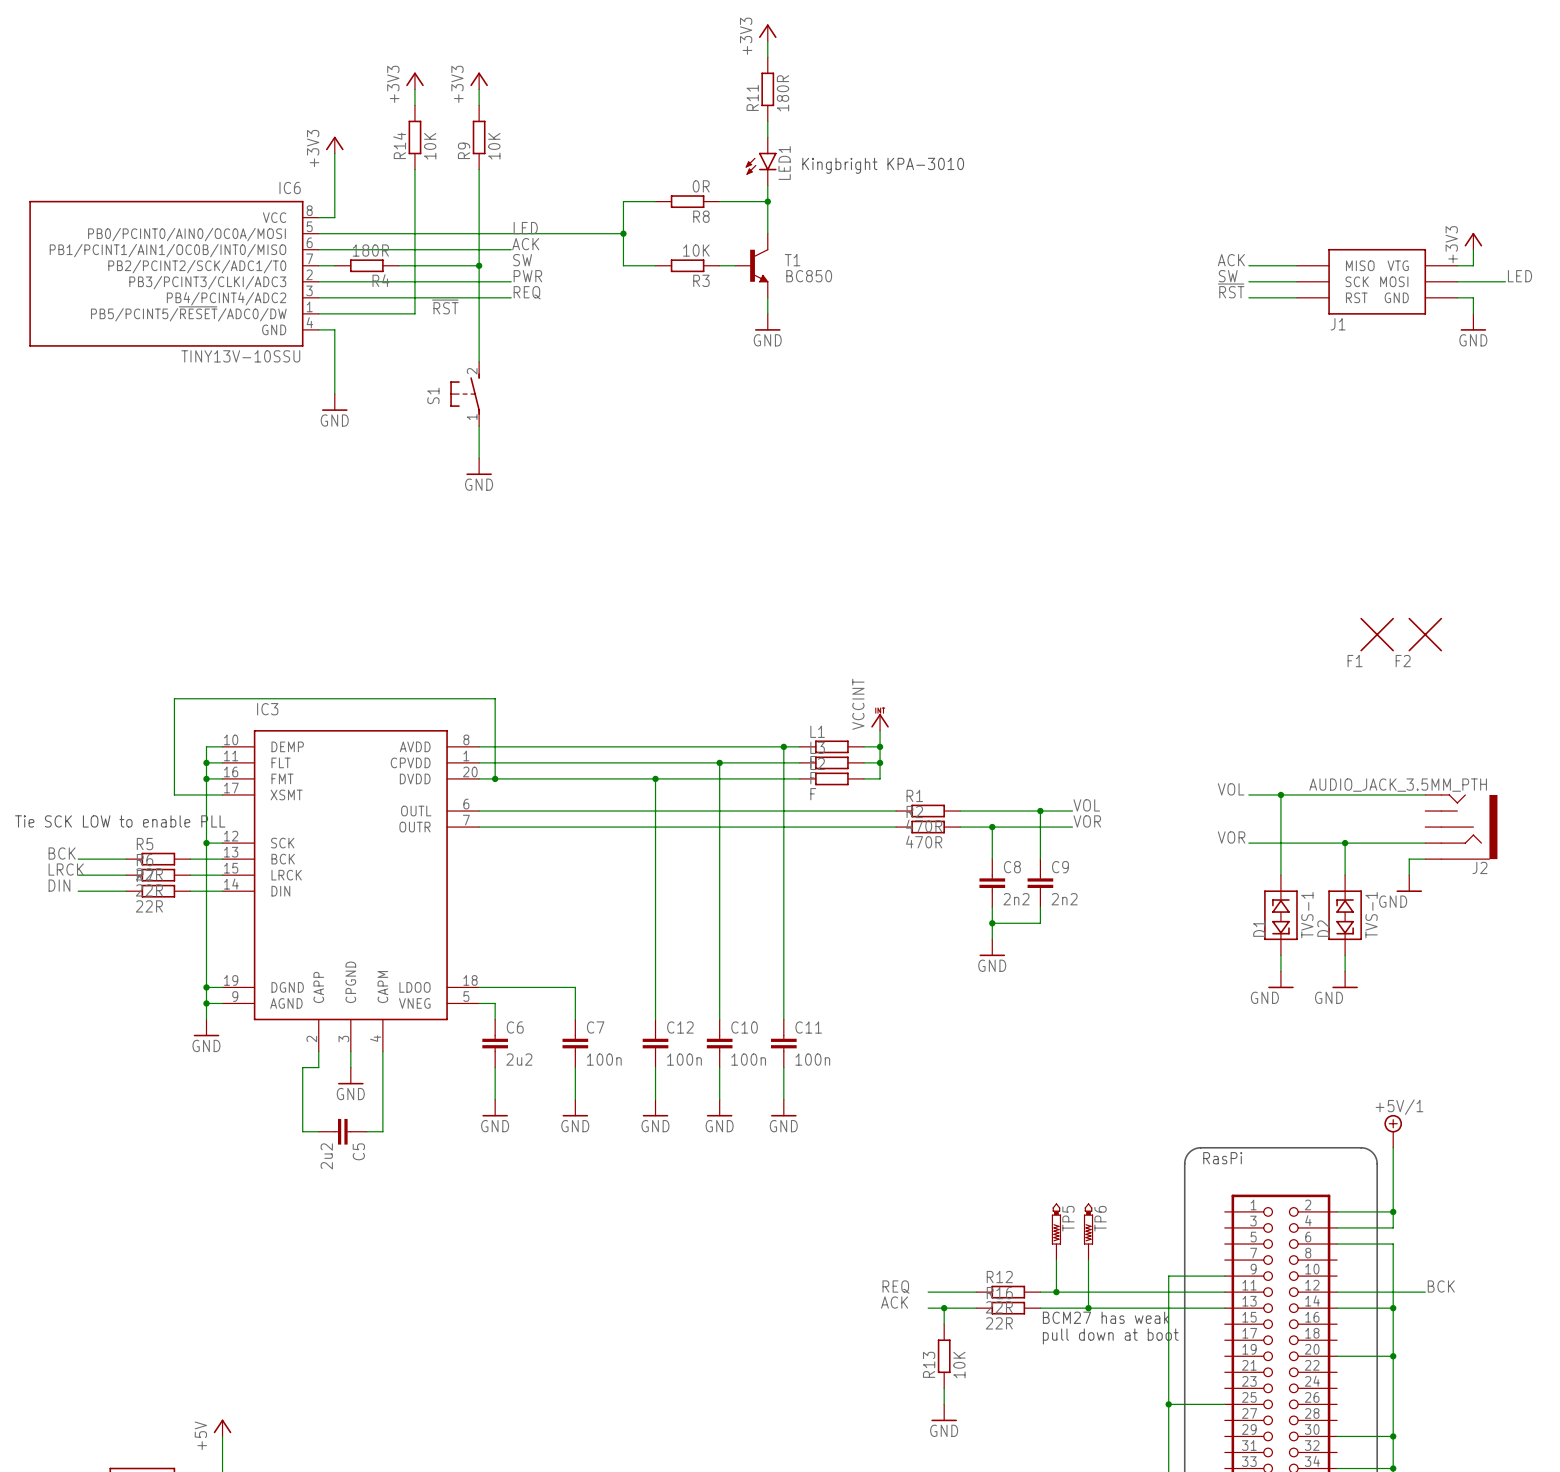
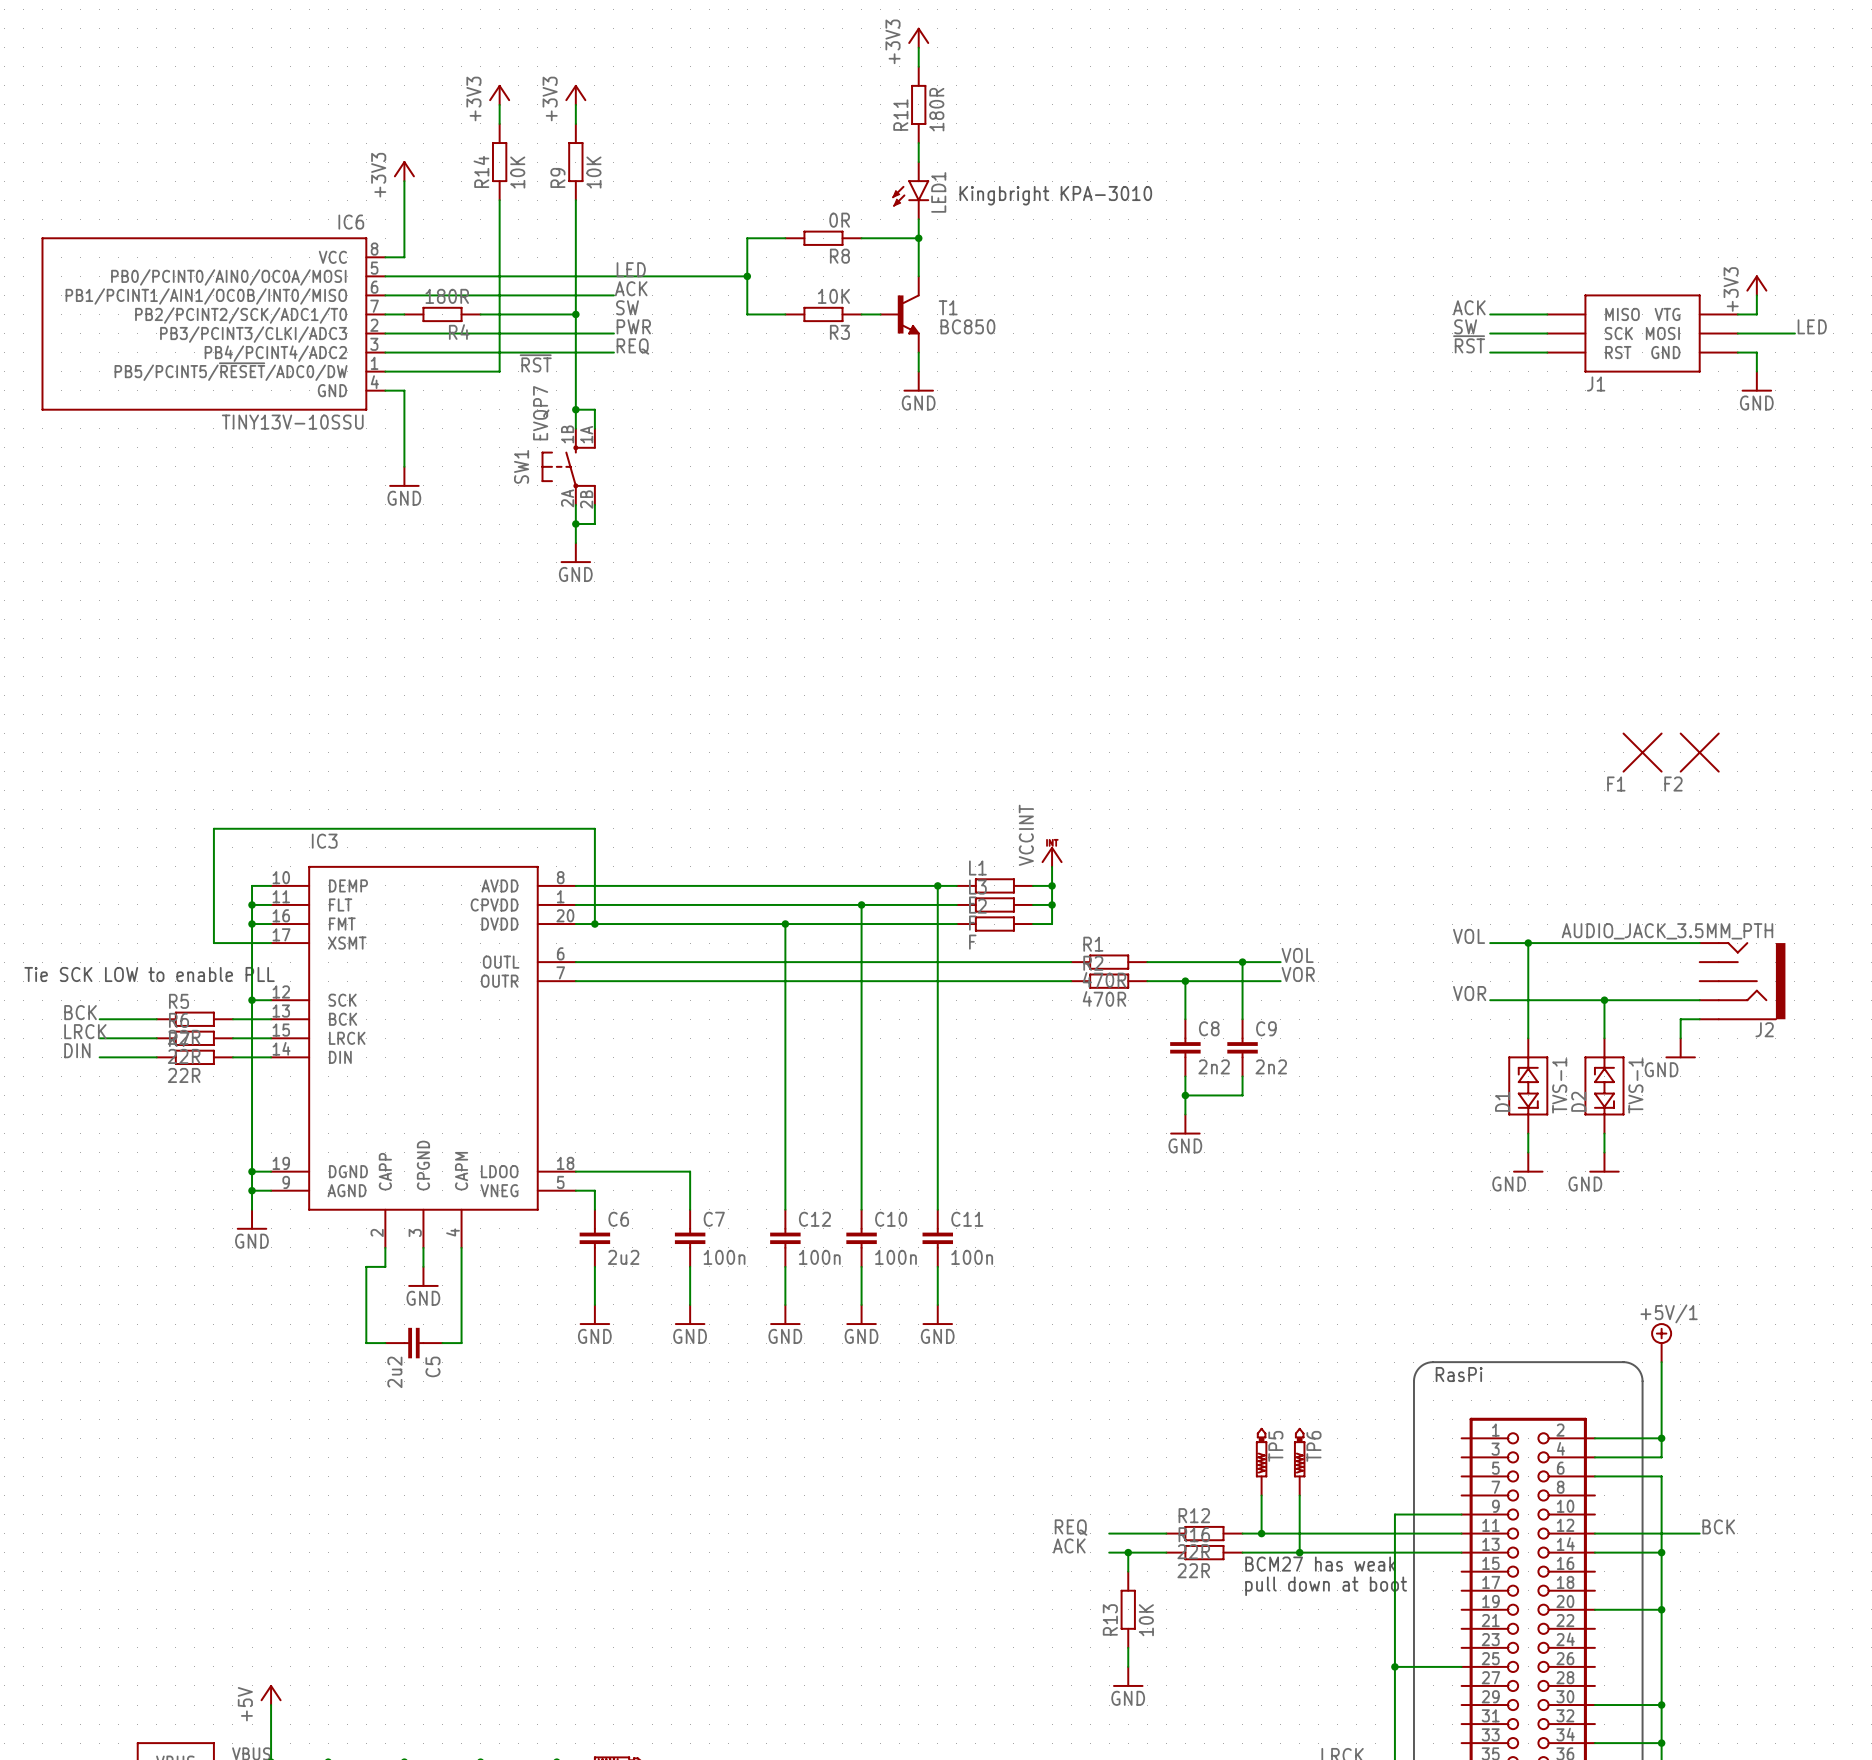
wire: none -> (575, 409) (594, 409) (594, 428)
junction: none -> (575, 409)
S1: (465, 394) -> none
SW1: none -> EVQP7 (568, 466)
wire: none -> (594, 504) (594, 524) (575, 524)
junction: none -> (575, 524)

